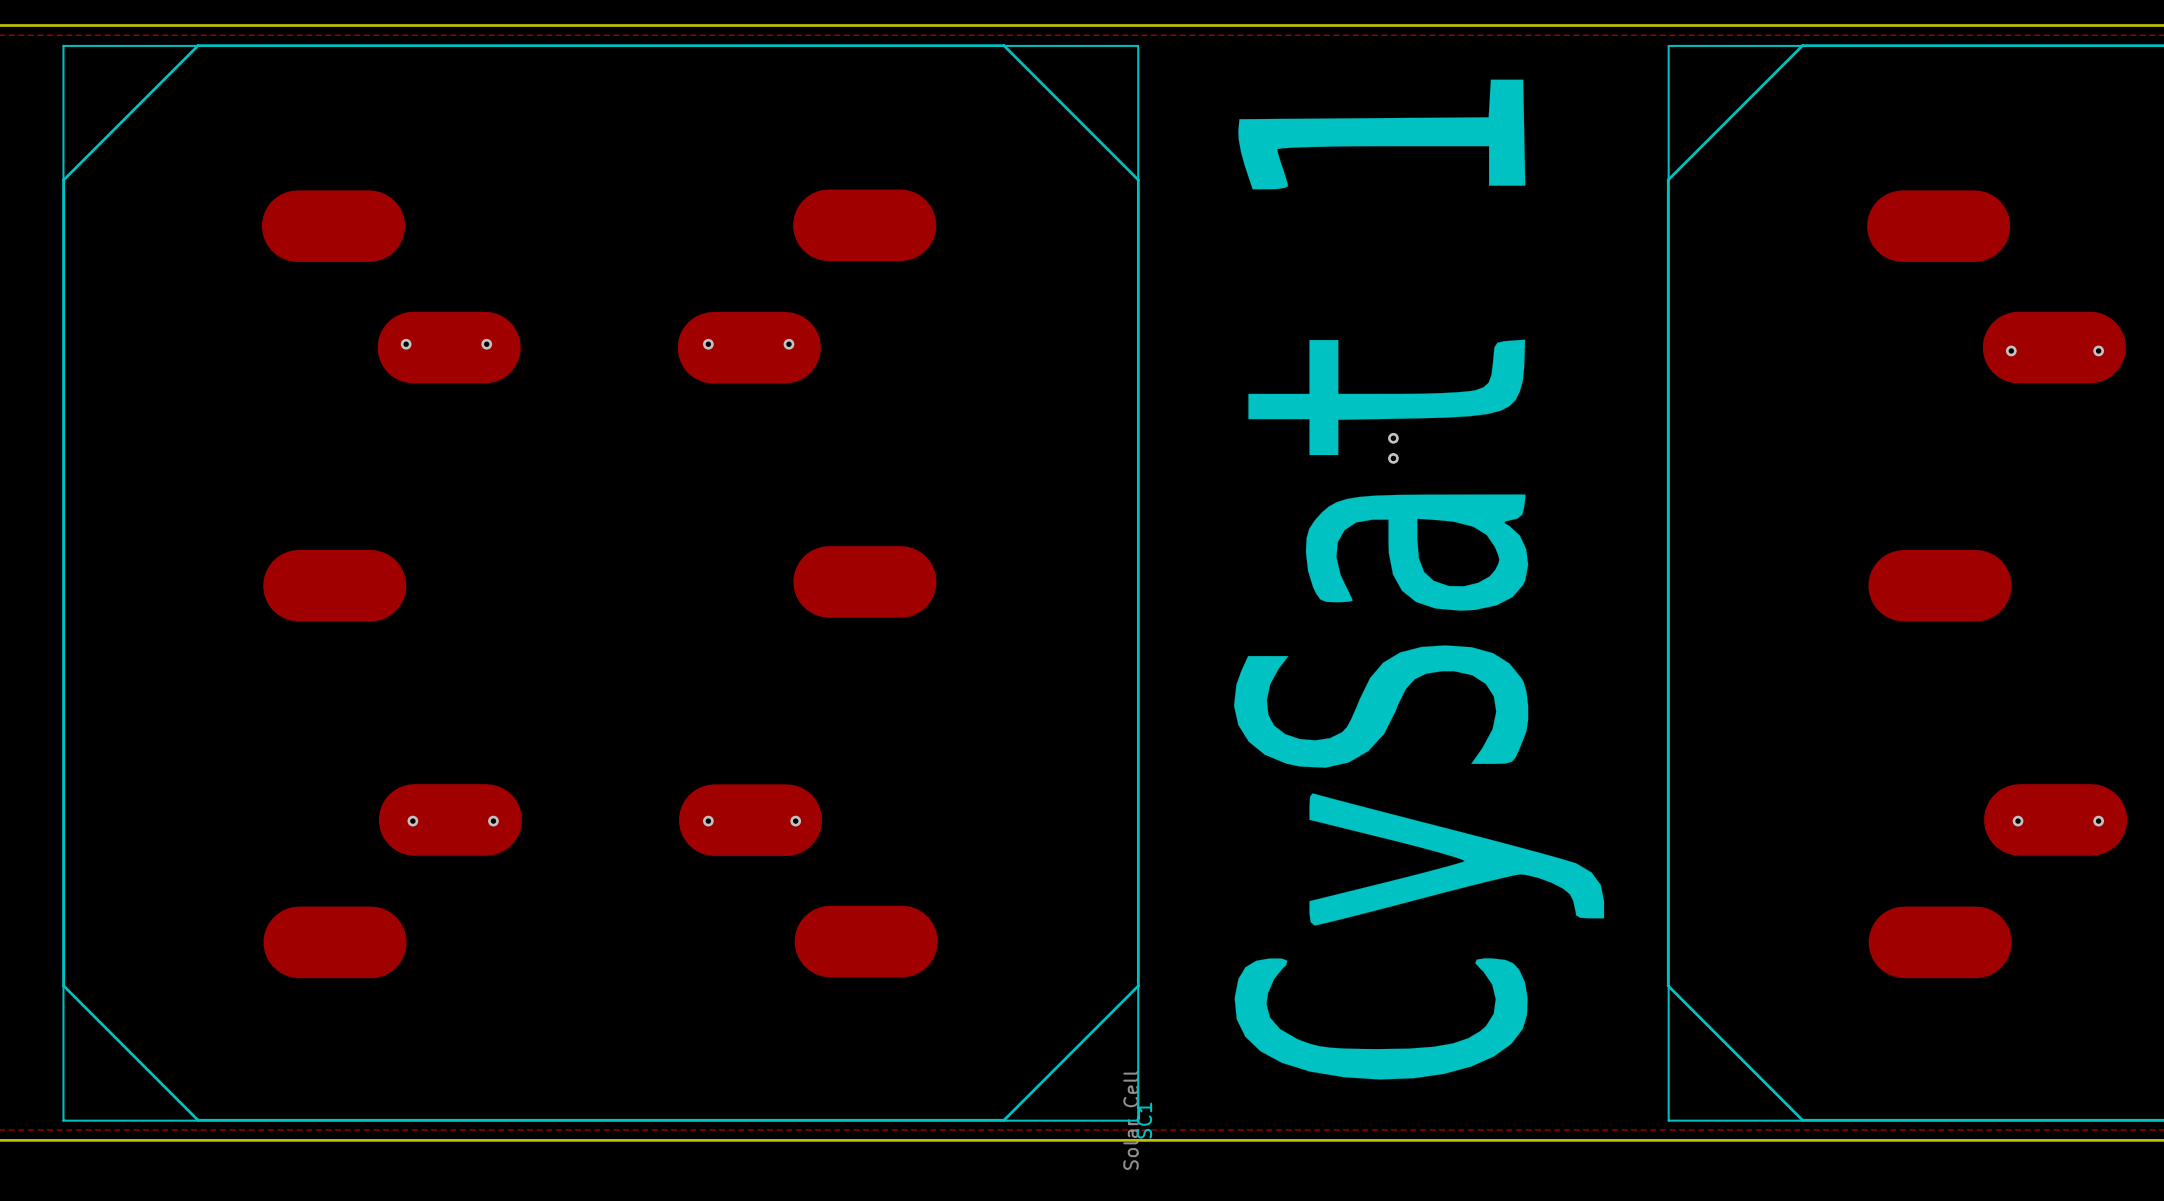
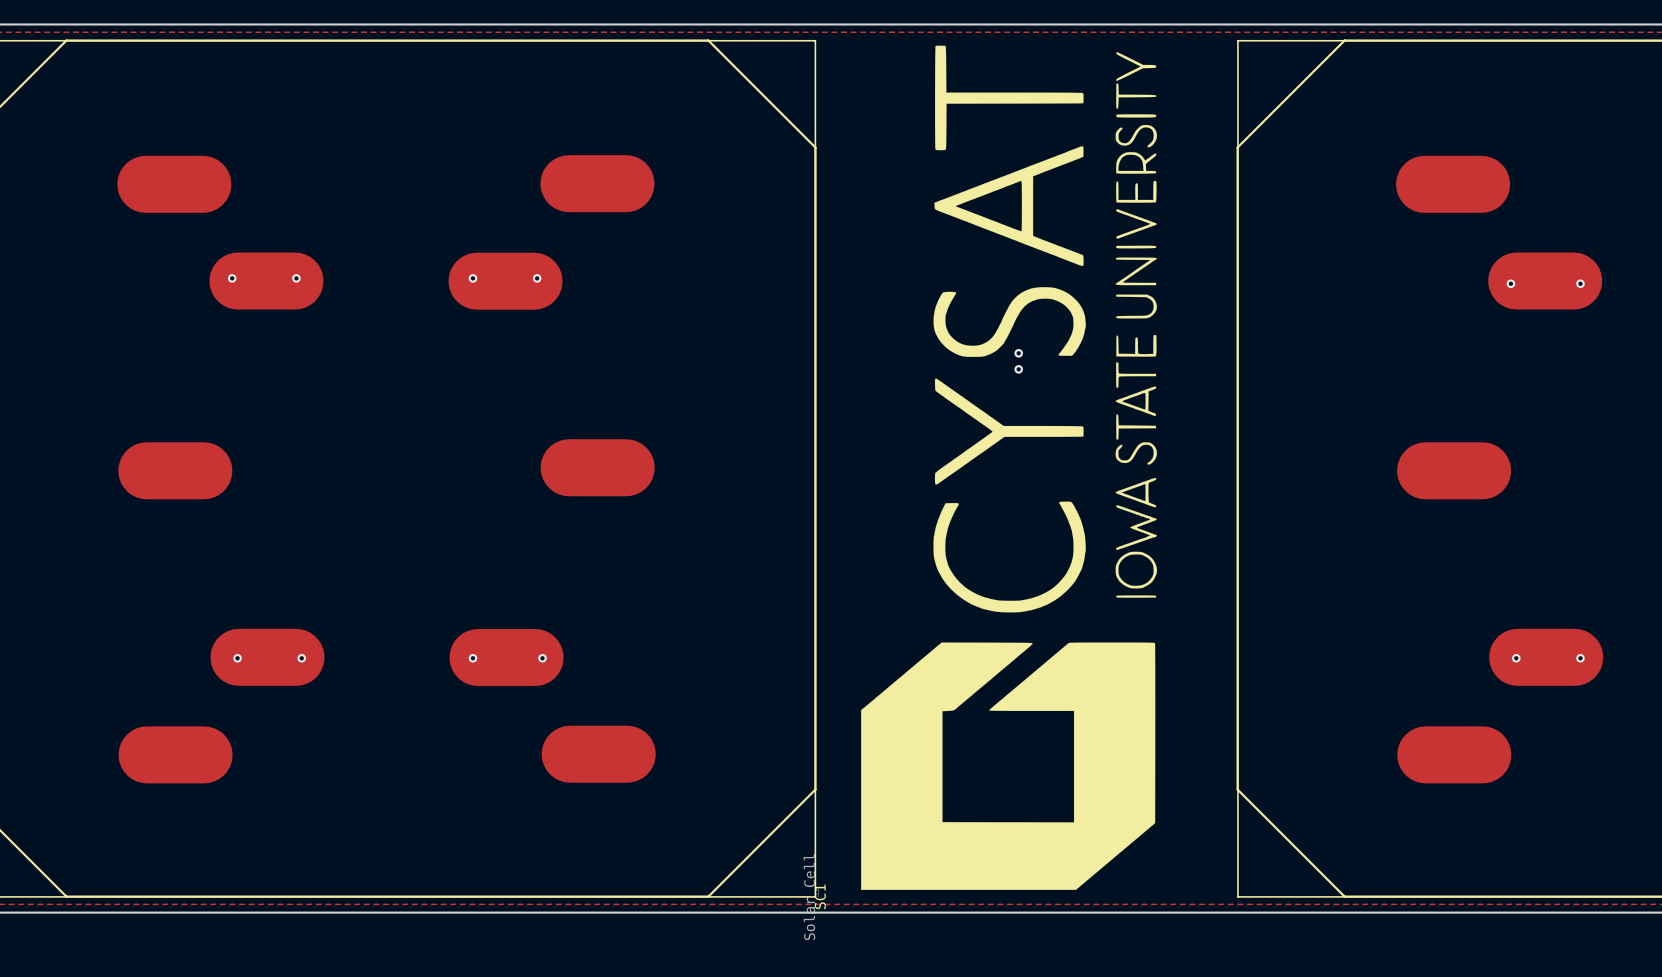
drawing: none -> [861, 45, 1158, 890]
drawing: [1234, 79, 1605, 1080] -> none

